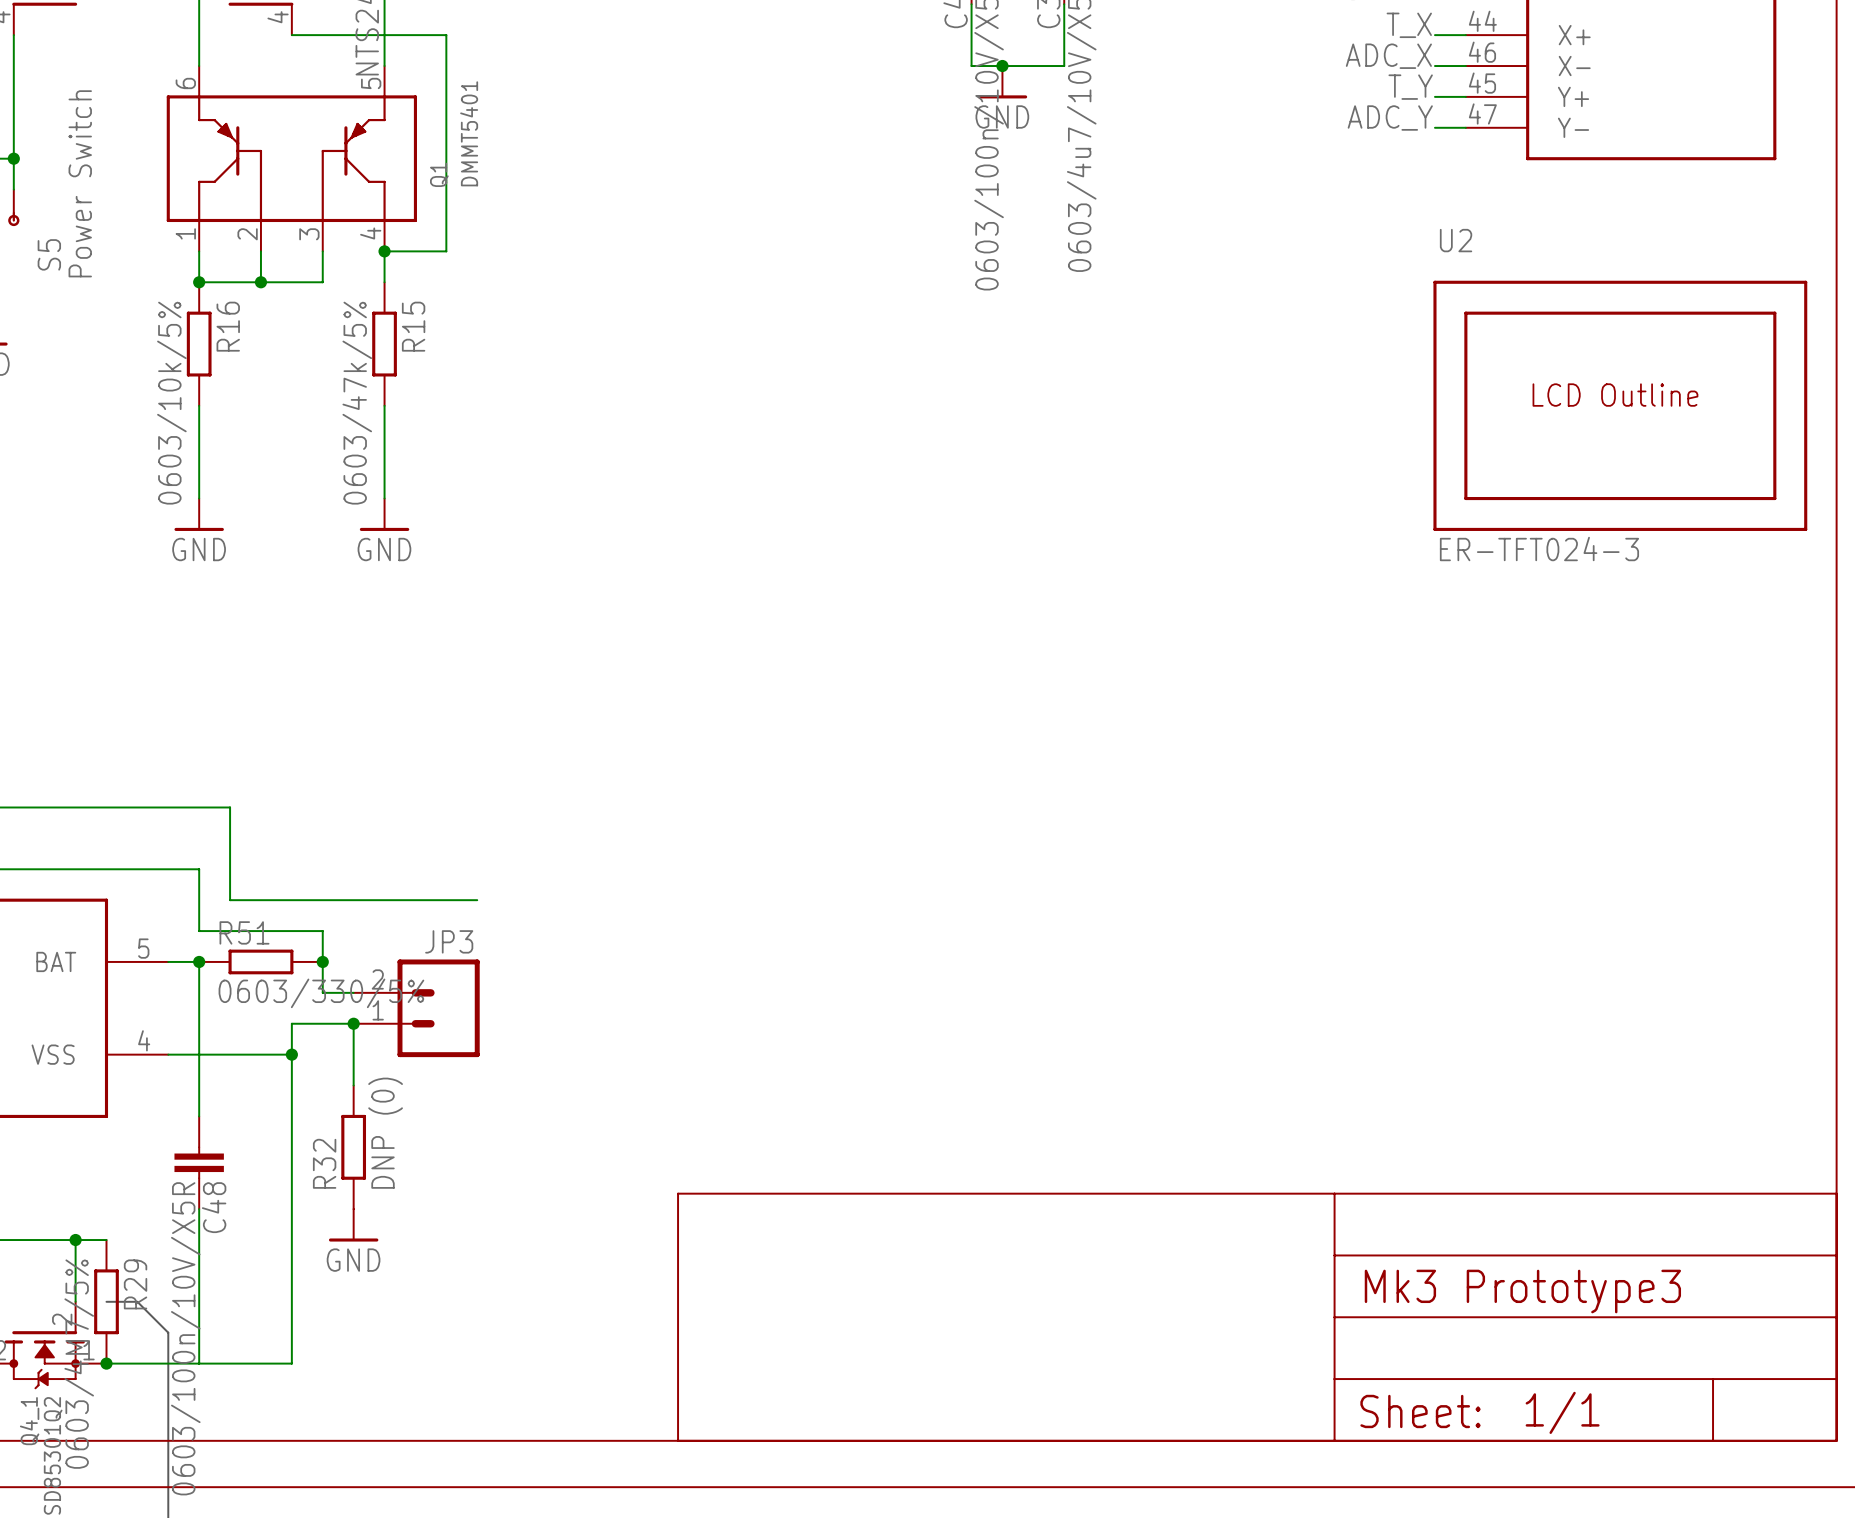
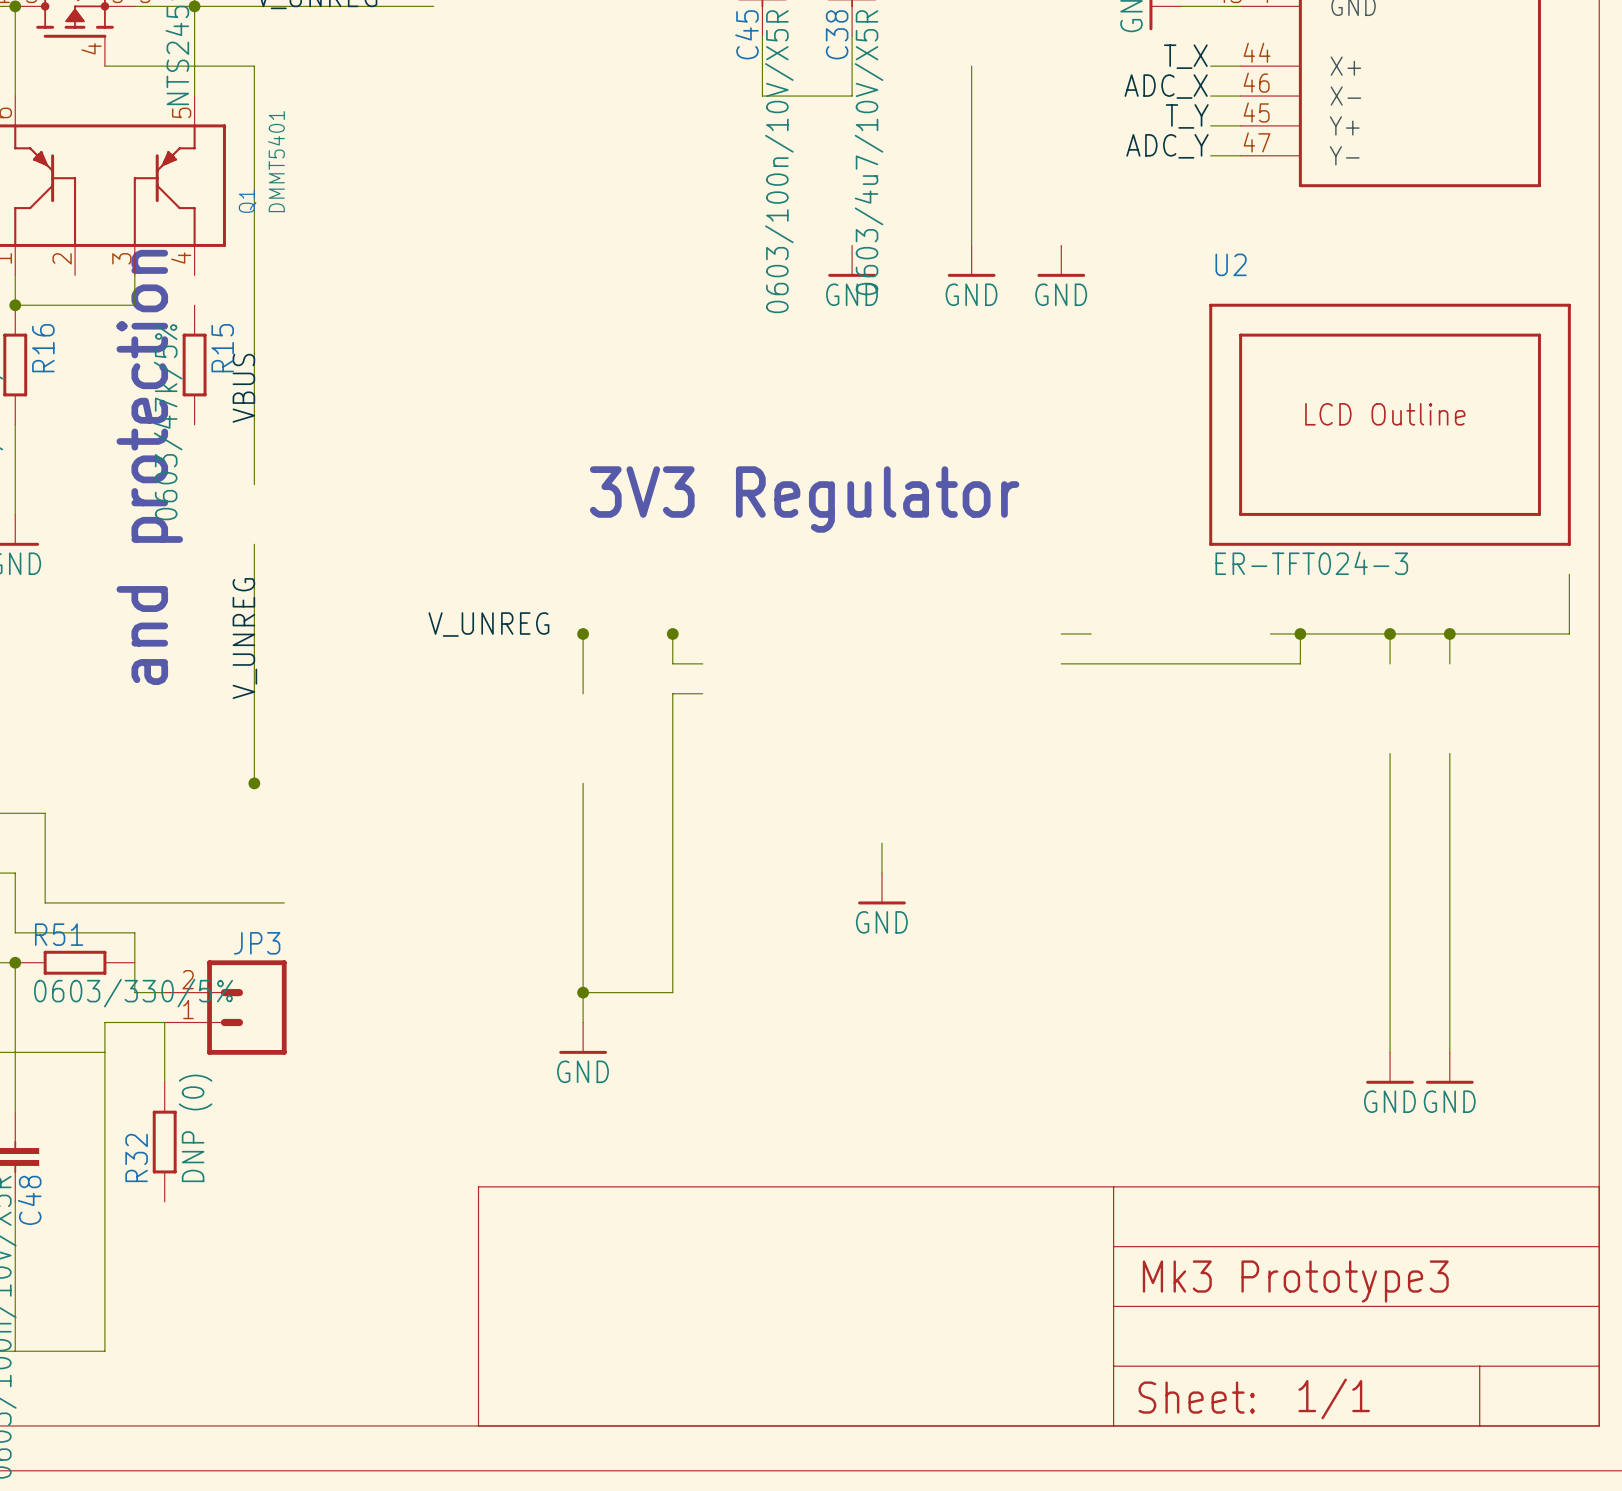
wire: none -> (971, 66) (971, 245)
junction: (1002, 66) -> none
power symbol: GND (1002, 82) -> none
power symbol: none -> GND (852, 261)
power symbol: none -> GND (971, 261)
power symbol: none -> GND (1061, 261)
wire: (260, 251) (260, 282) -> none
junction: (384, 251) -> none
wire: (446, 251) (384, 251) (384, 282) -> (254, 275) (254, 484)
junction: (260, 282) -> none
label: none -> VBUS (243, 388)
wire: (384, 405) (384, 498) -> none
text: none -> and protection (149, 467)
text: none -> 3V3 Regulator (804, 499)
power symbol: GND (384, 514) -> none
wire: none -> (254, 544) (254, 783)
wire: none -> (1569, 574) (1569, 633) (1270, 633)
label: none -> V_UNREG (488, 624)
wire: none -> (583, 633) (583, 693)
junction: none -> (583, 633)
wire: none -> (672, 633) (672, 663) (702, 663)
junction: none -> (672, 633)
wire: none -> (1061, 633) (1091, 633)
wire: none -> (1300, 633) (1300, 663) (1061, 663)
junction: none -> (1300, 633)
wire: none -> (1390, 633) (1390, 663)
junction: none -> (1390, 633)
wire: none -> (1449, 633) (1449, 663)
junction: none -> (1449, 633)
label: none -> V_UNREG (244, 638)
wire: none -> (702, 693) (672, 693) (672, 992) (583, 992)
wire: none -> (1390, 753) (1390, 1052)
wire: none -> (1449, 753) (1449, 1052)
junction: none -> (254, 783)
wire: none -> (583, 783) (583, 1022)
wire: none -> (881, 843) (881, 873)
power symbol: none -> GND (881, 888)
junction: (322, 961) -> none
junction: none -> (583, 992)
junction: (353, 1023) -> none
power symbol: none -> GND (583, 1038)
junction: (291, 1054) -> none
power symbol: none -> GND (1390, 1068)
power symbol: none -> GND (1449, 1068)
power symbol: GND (353, 1225) -> none

